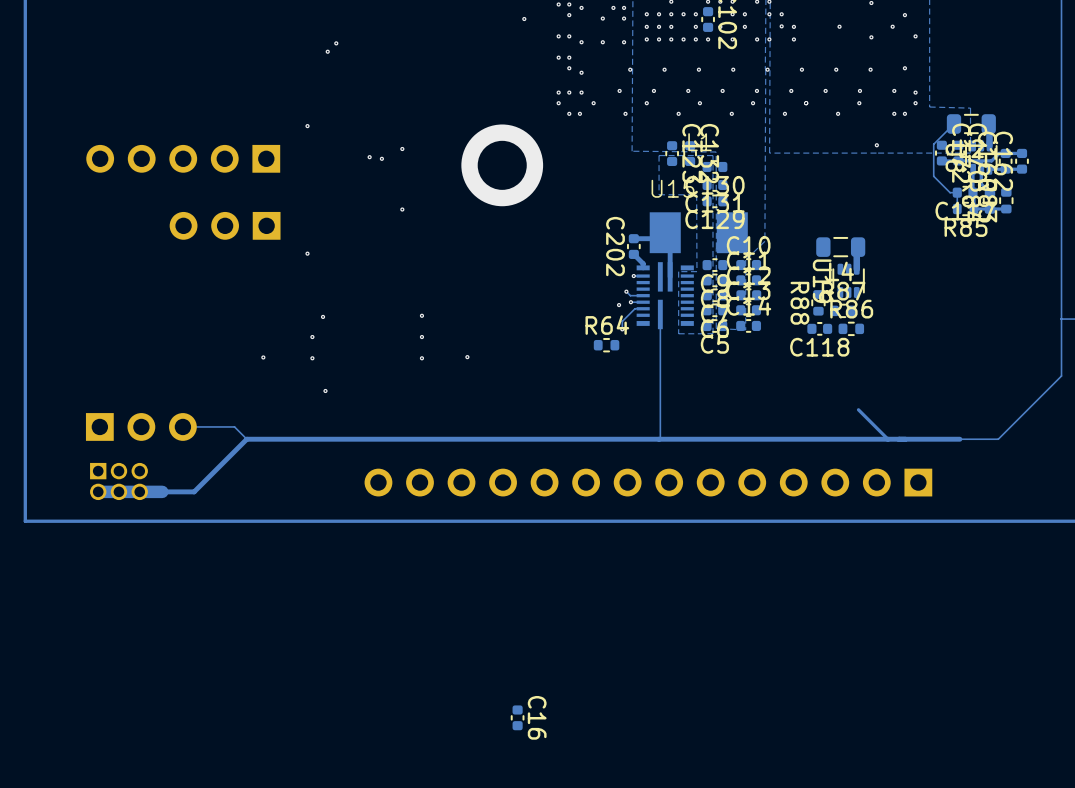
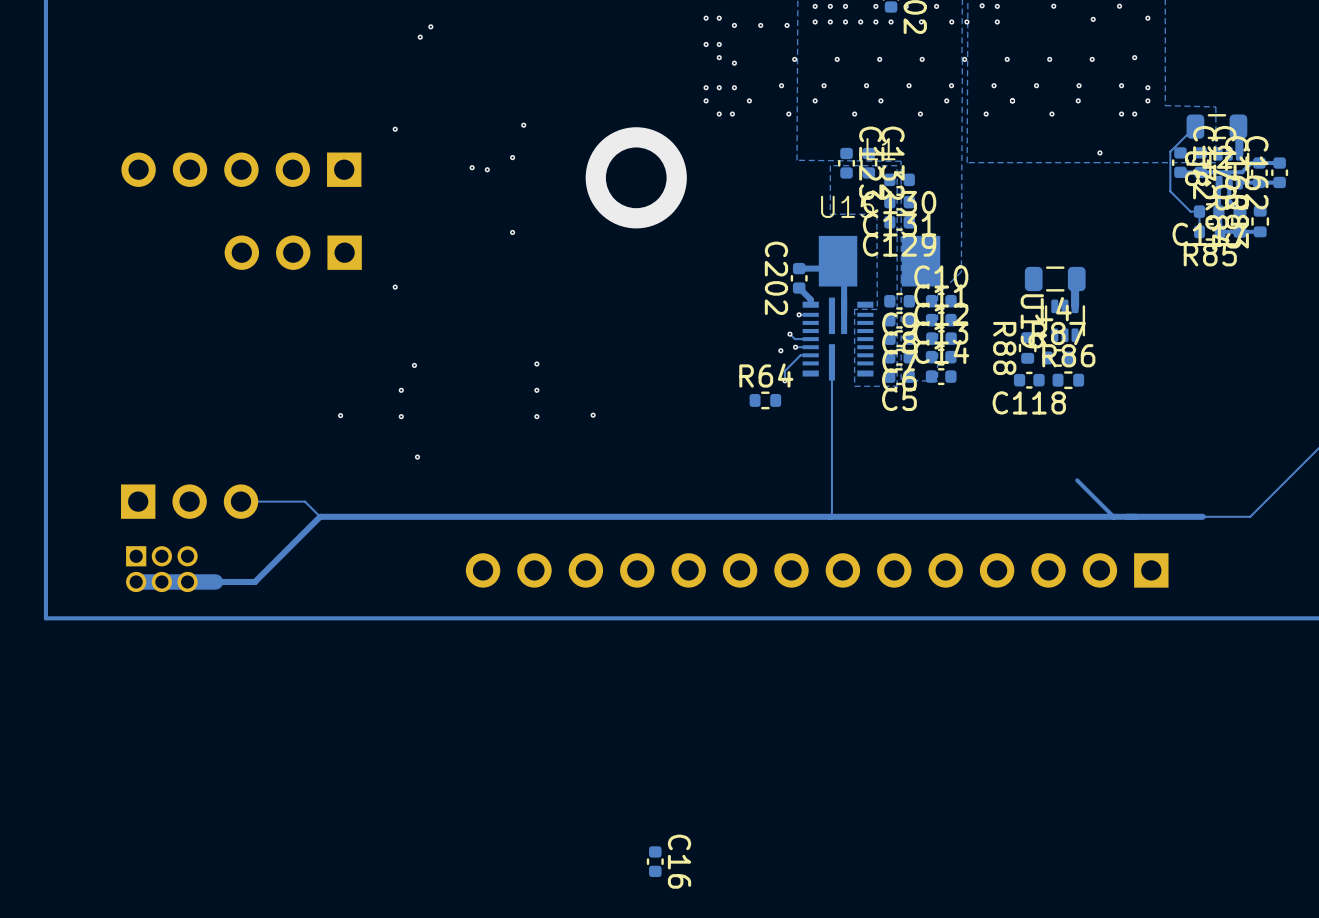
via: none -> (523, 125)

